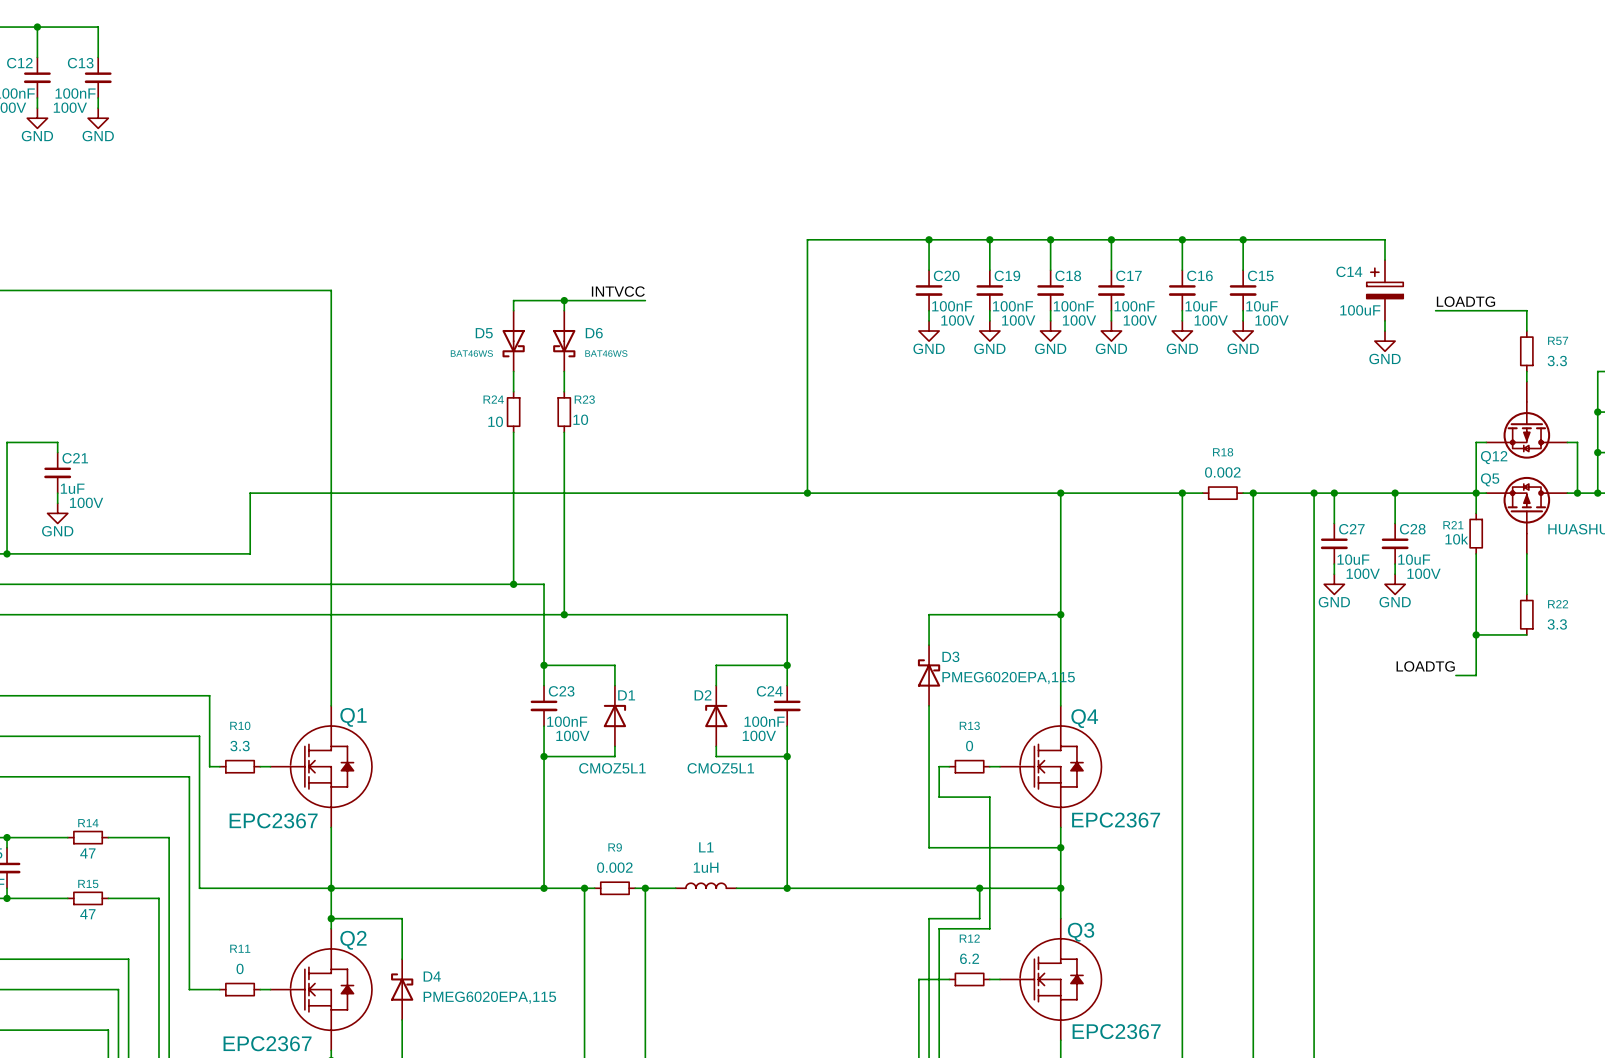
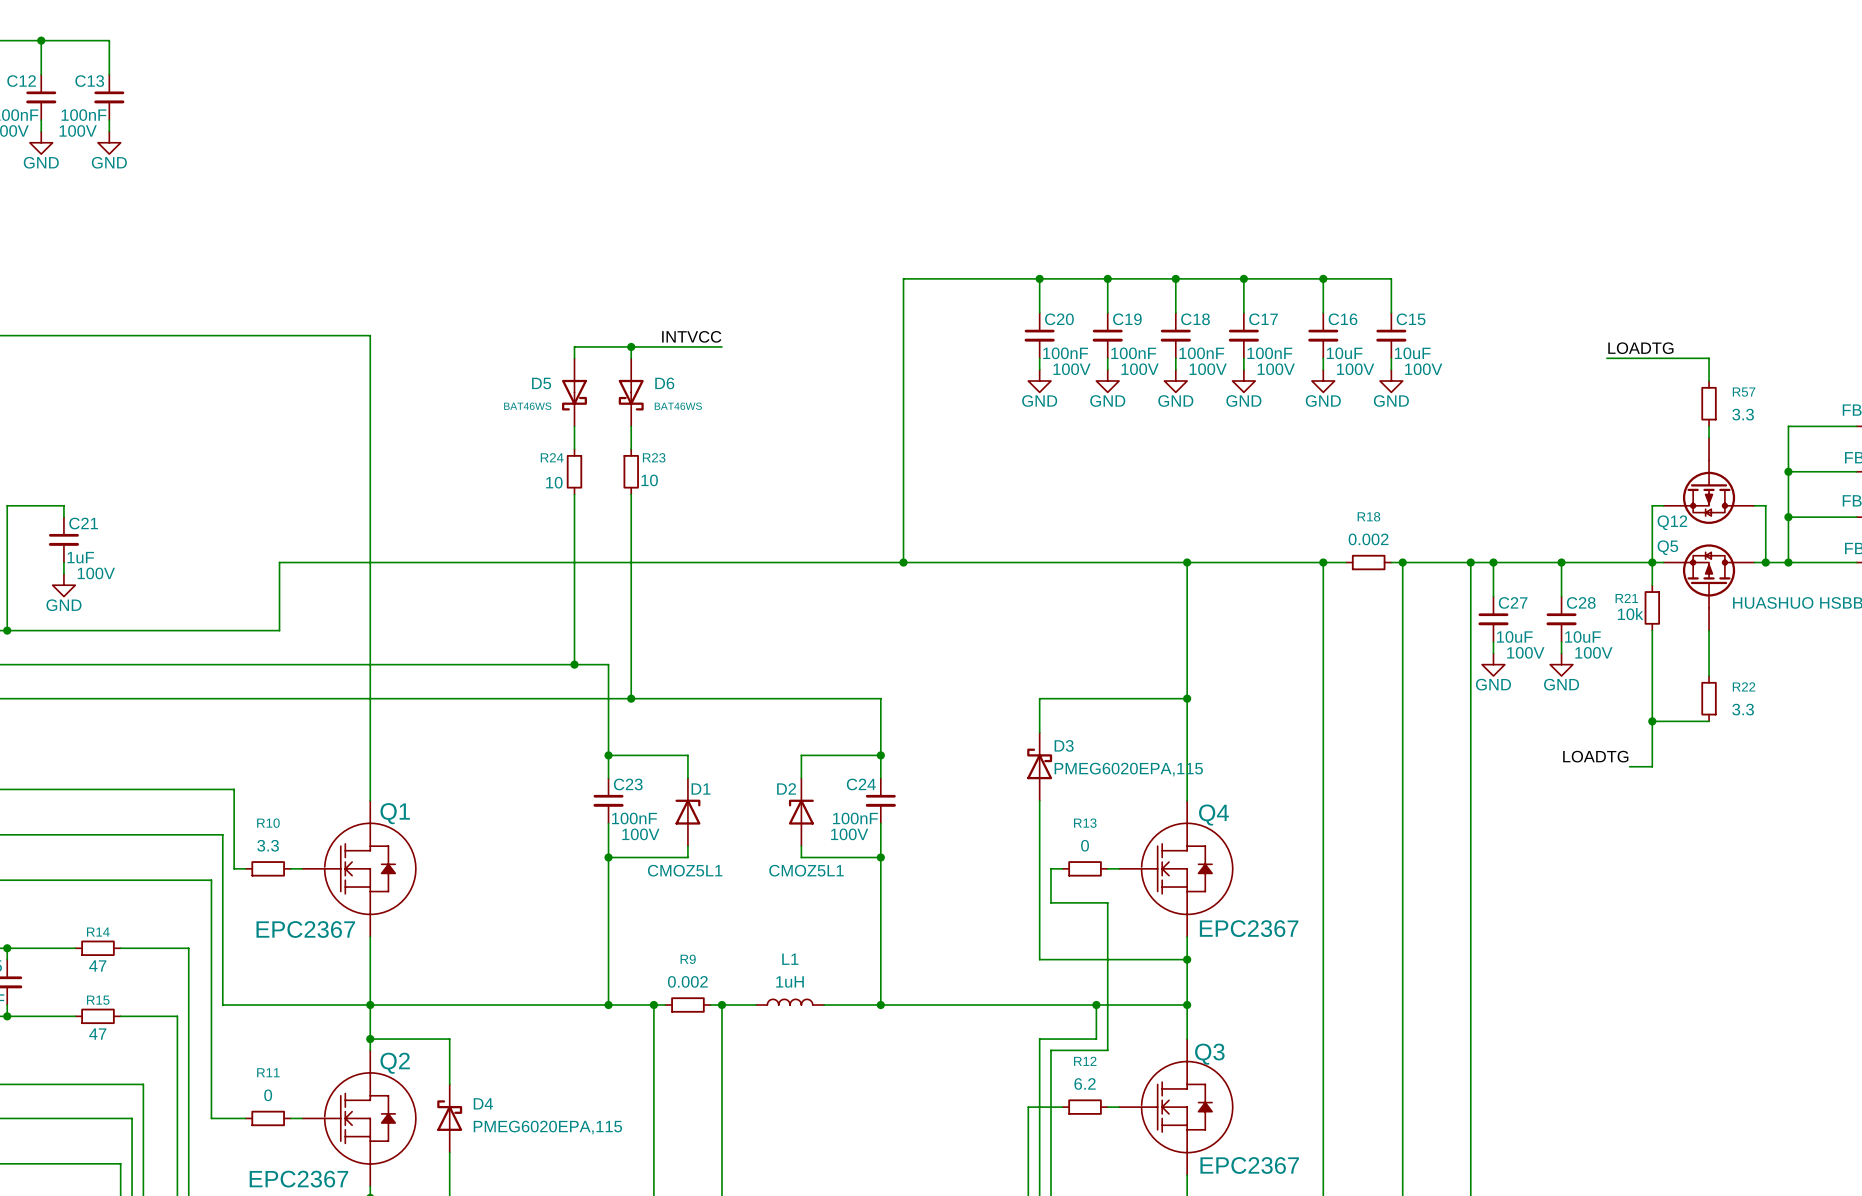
wire: (1243, 239) (1384, 239) (1384, 260) -> none
junction: (1243, 239) -> none
C14: 100uF (1384, 290) -> none
wire: (1384, 320) (1384, 331) -> none
power symbol: GND (1384, 341) -> none

